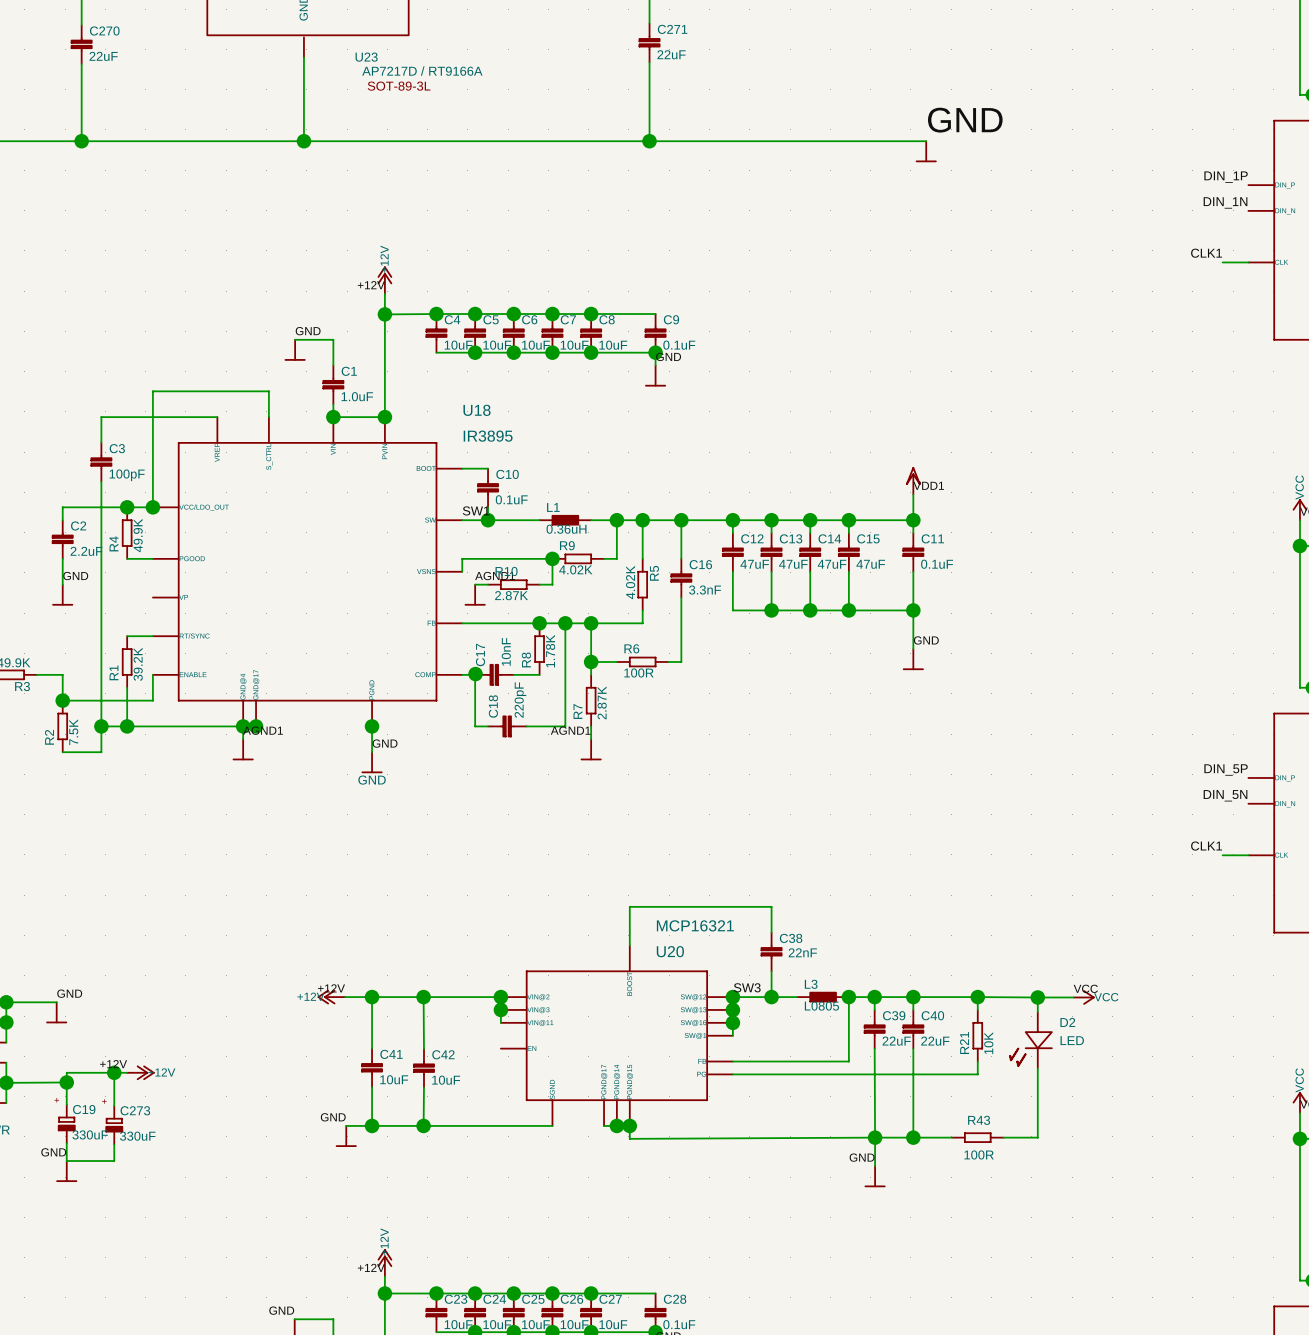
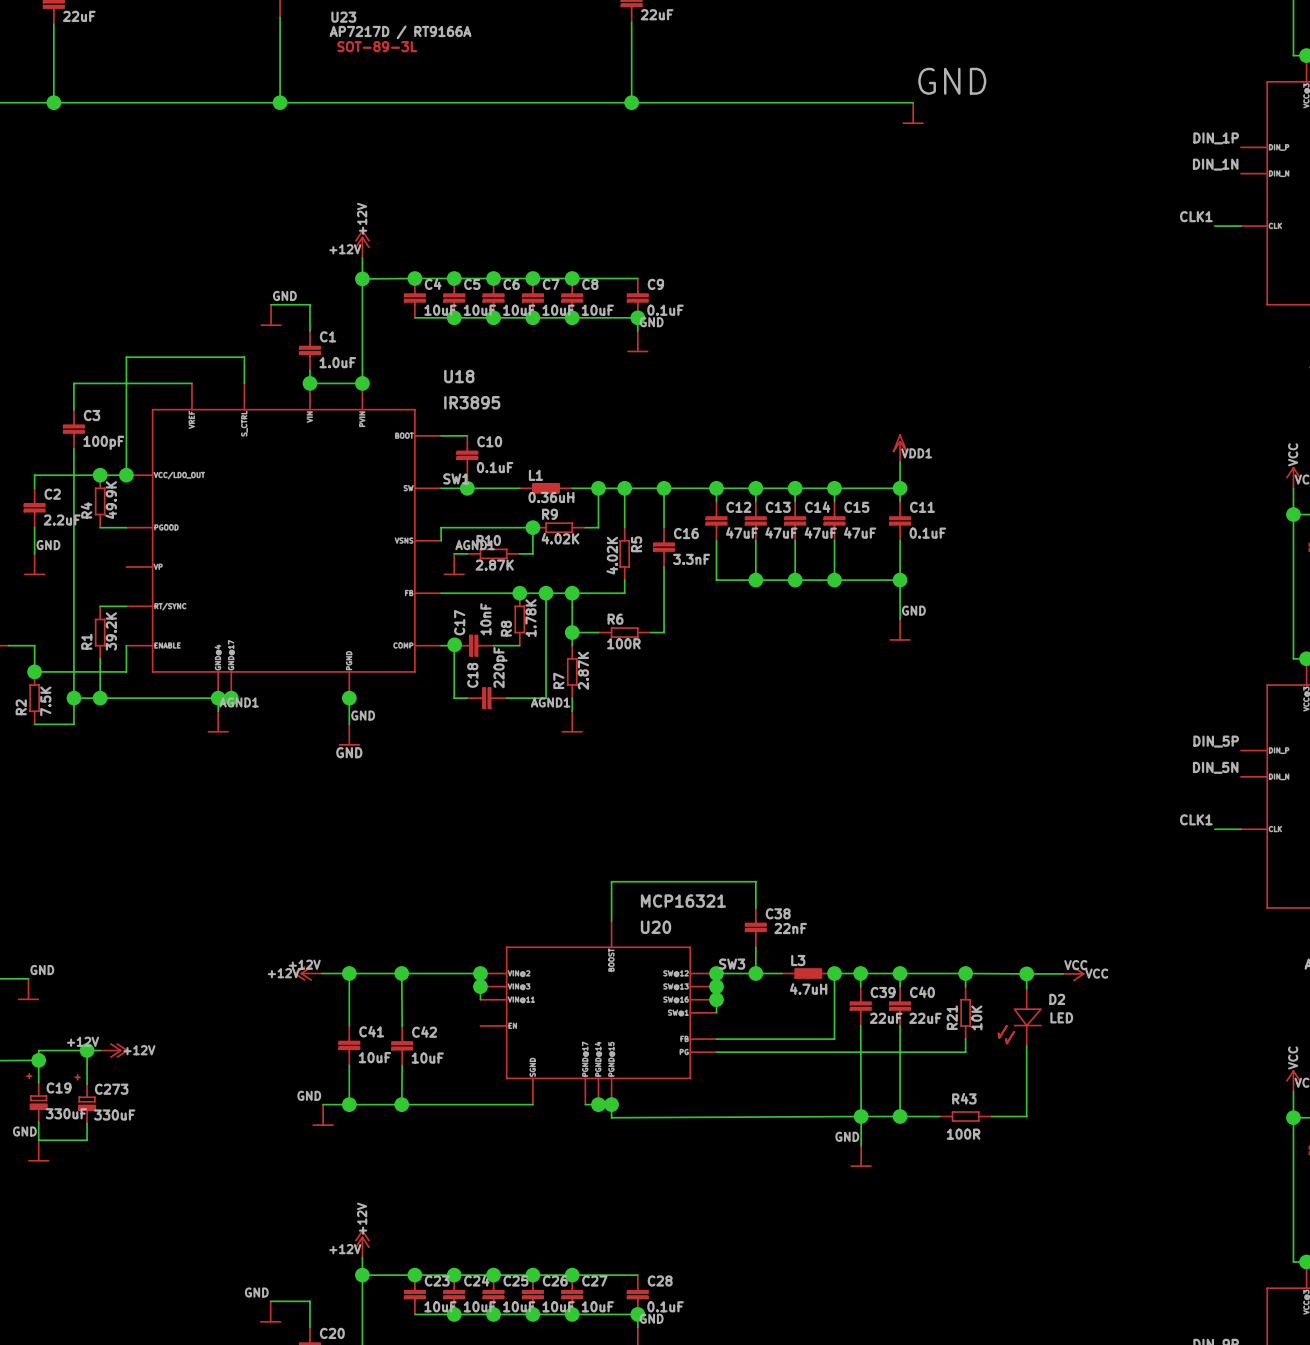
L3 value: L0805 (821, 1006) -> 4.7uH (808, 988)

